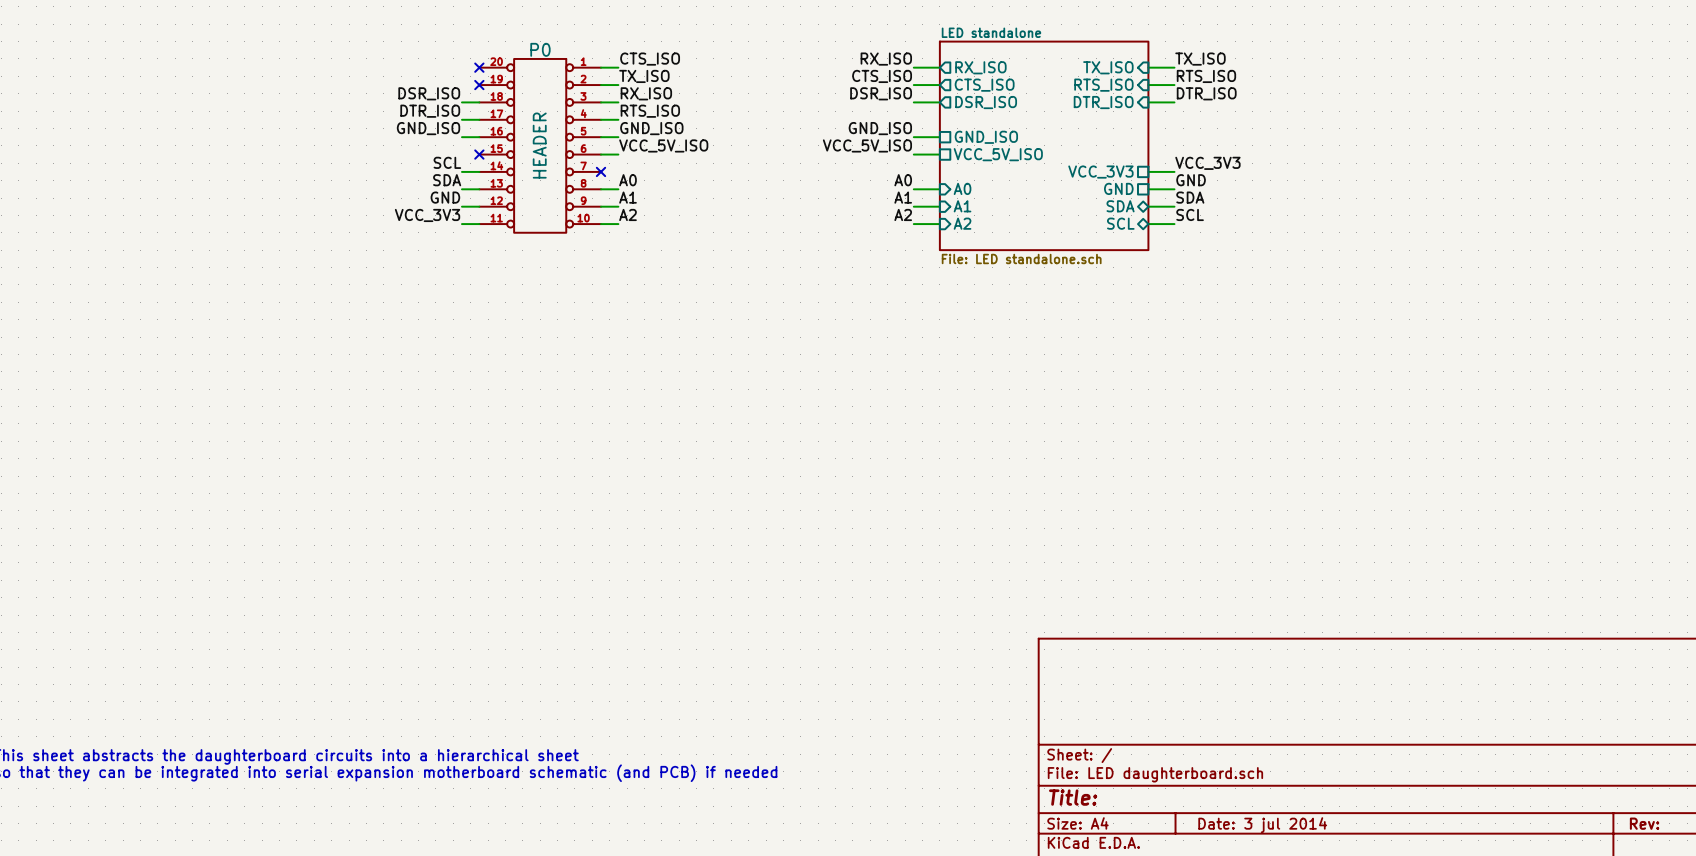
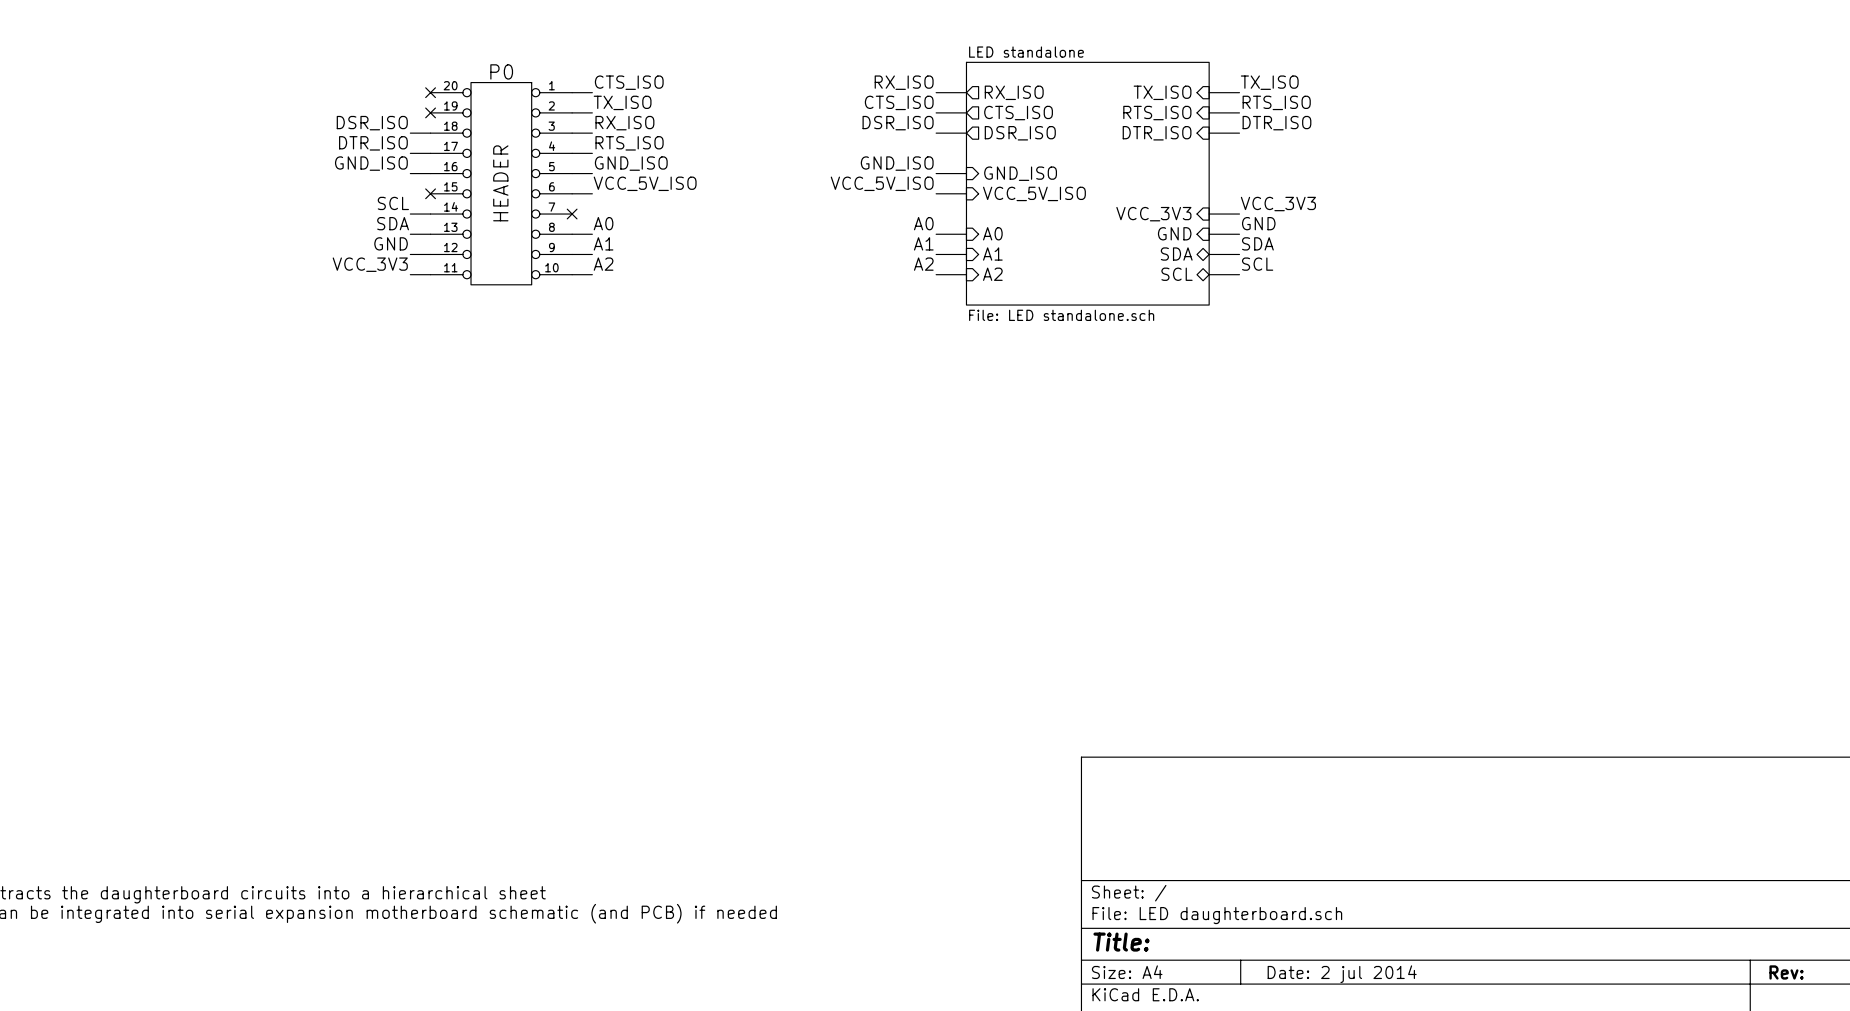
sheet pin shape: passive (986, 137) -> input (1020, 173)
sheet pin shape: passive (998, 154) -> input (1034, 193)
sheet pin shape: passive (1100, 172) -> input (1153, 214)
sheet pin shape: passive (1118, 188) -> input (1174, 233)
title block: Date: 3 jul 2014 (1262, 825) -> Date: 2 jul 2014 (1342, 974)

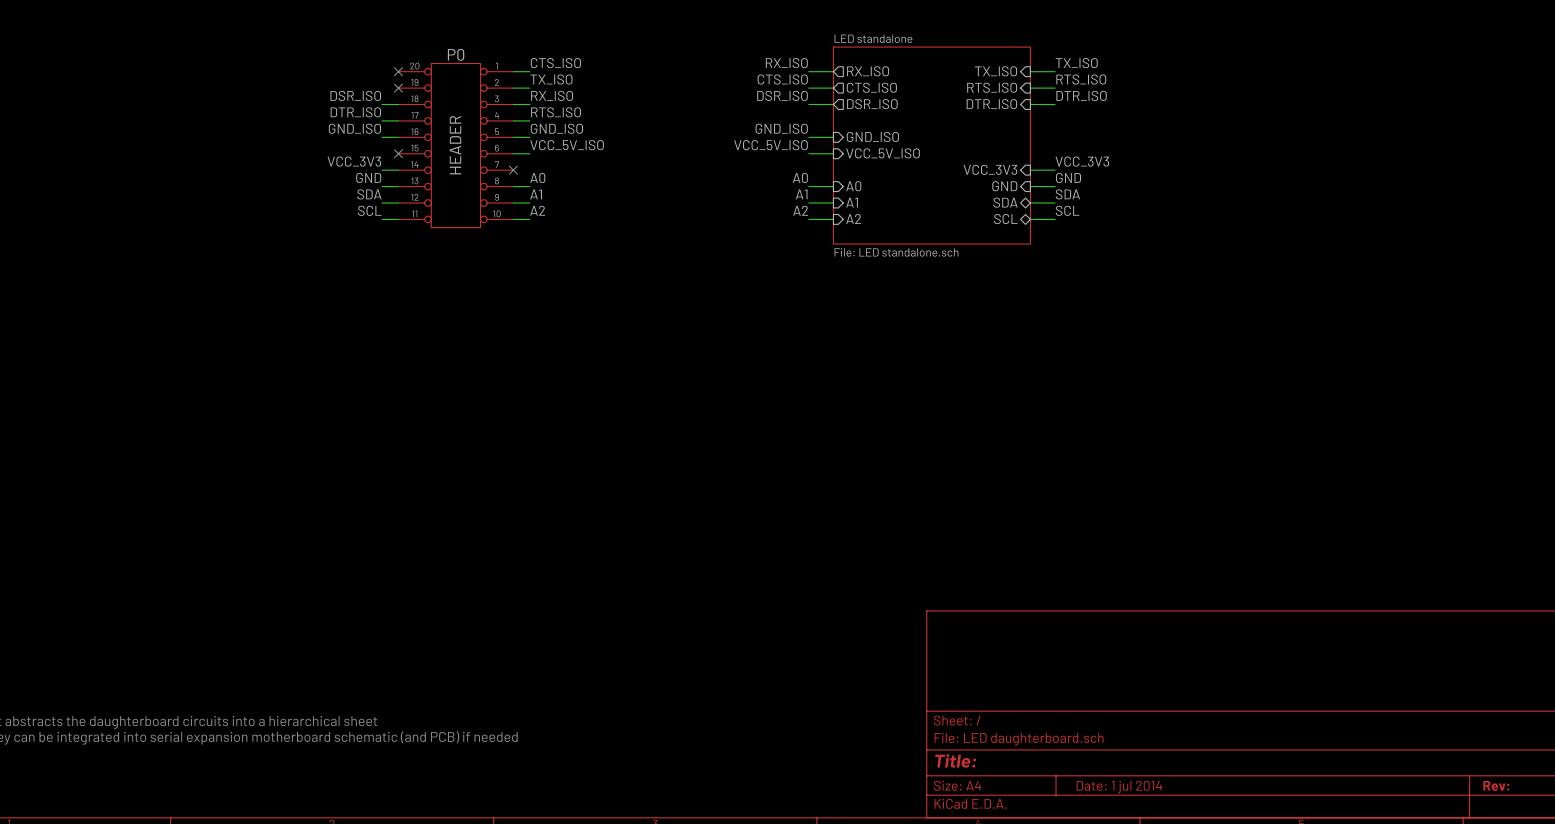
label: SCL (393, 203) -> VCC_3V3 (354, 161)
label: SDA (393, 223) -> GND (368, 178)
label: GND (391, 243) -> SDA (369, 194)
label: VCC_3V3 (370, 264) -> SCL (369, 210)
title block: Date: 2 jul 2014 (1342, 974) -> Date: 1 jul 2014 (1119, 787)

